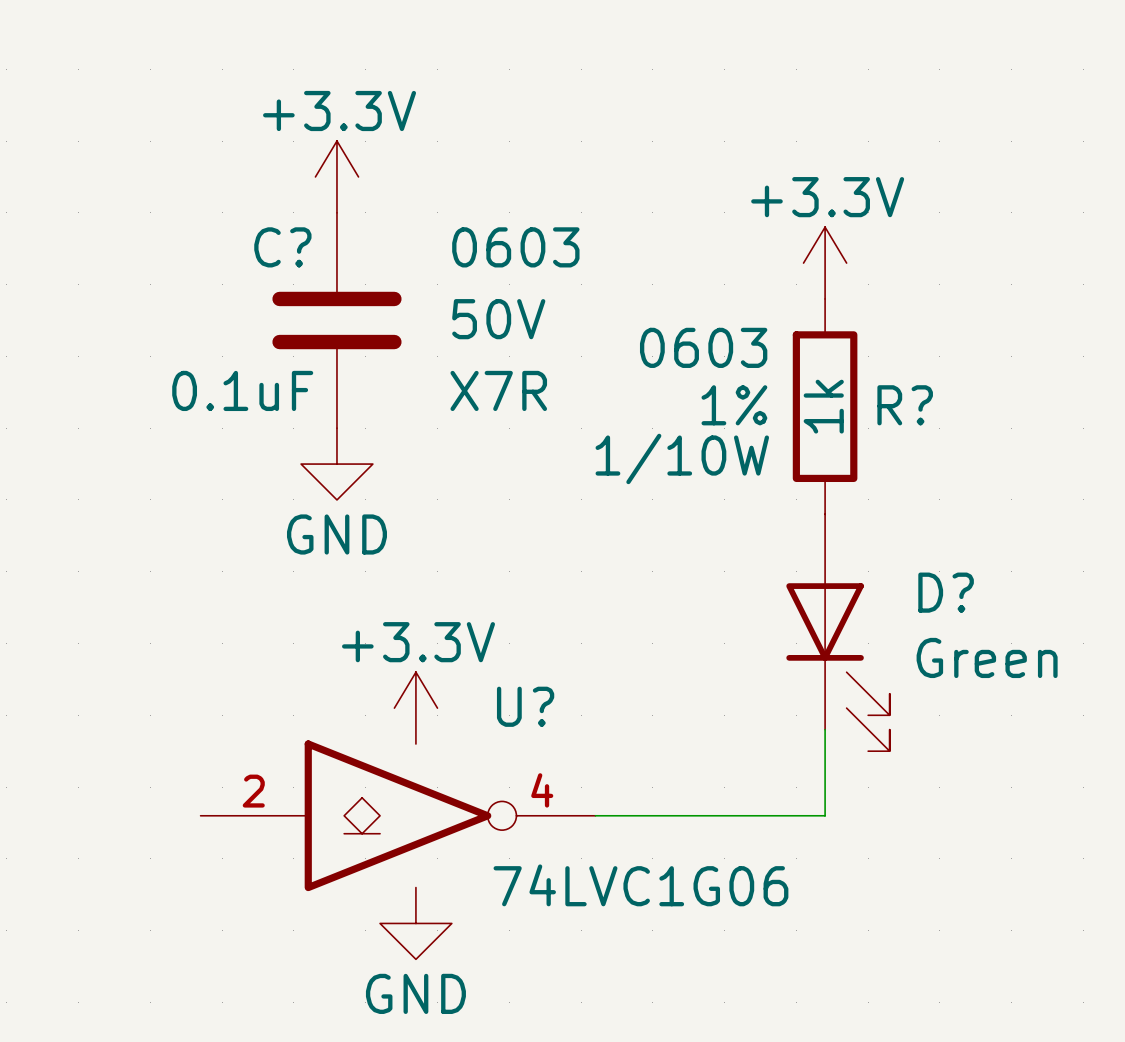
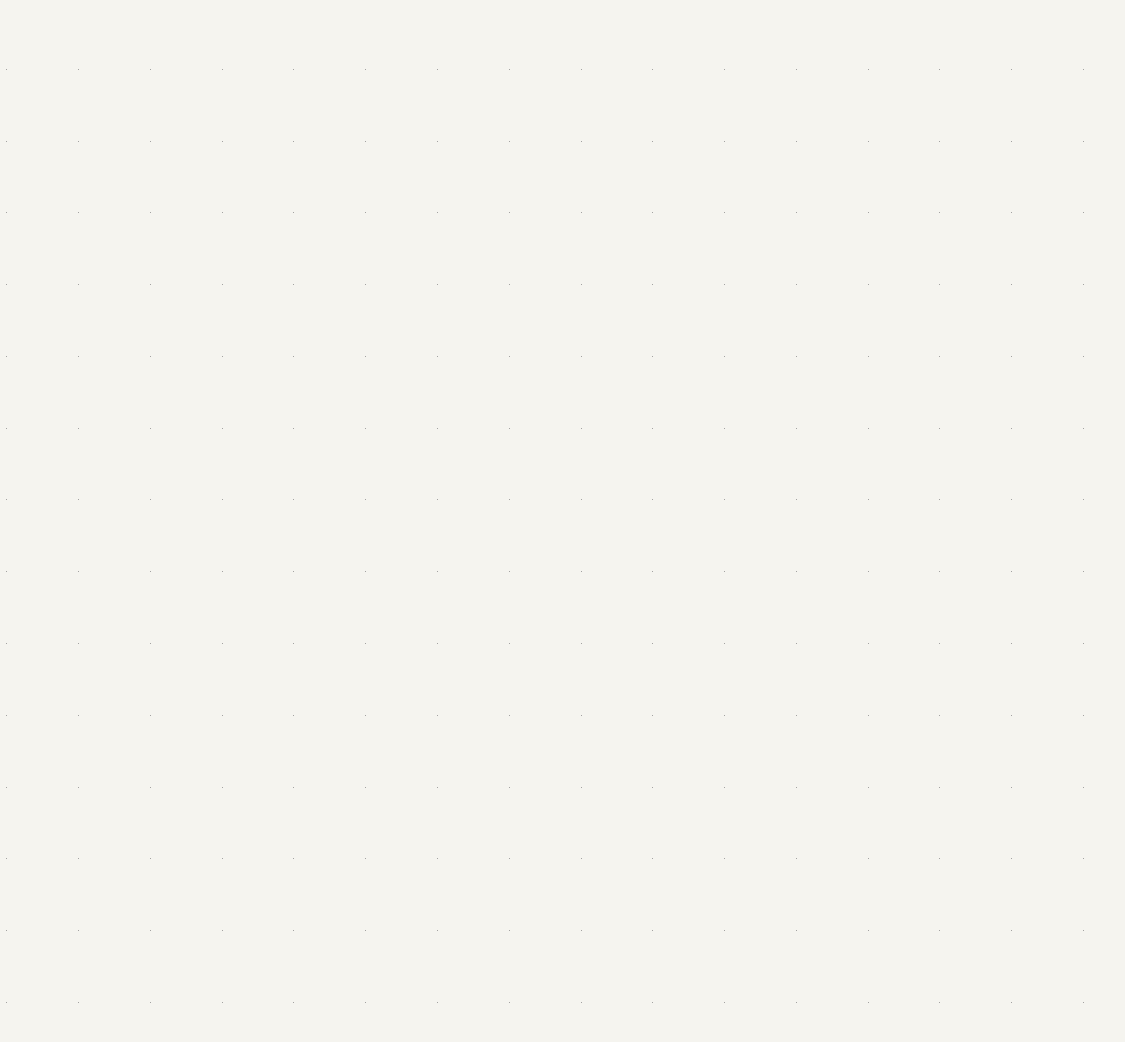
power symbol: +3.3V (336, 176) -> none
power symbol: +3.3V (825, 263) -> none
C?: 0.1uF (336, 320) -> none
R?: 1k (825, 406) -> none
power symbol: GND (336, 464) -> none
D?: Green (838, 632) -> none
power symbol: +3.3V (415, 708) -> none
wire: (825, 729) (825, 815) (595, 815) -> none
U?: 74LVC1G06 (397, 815) -> none
power symbol: GND (415, 923) -> none

